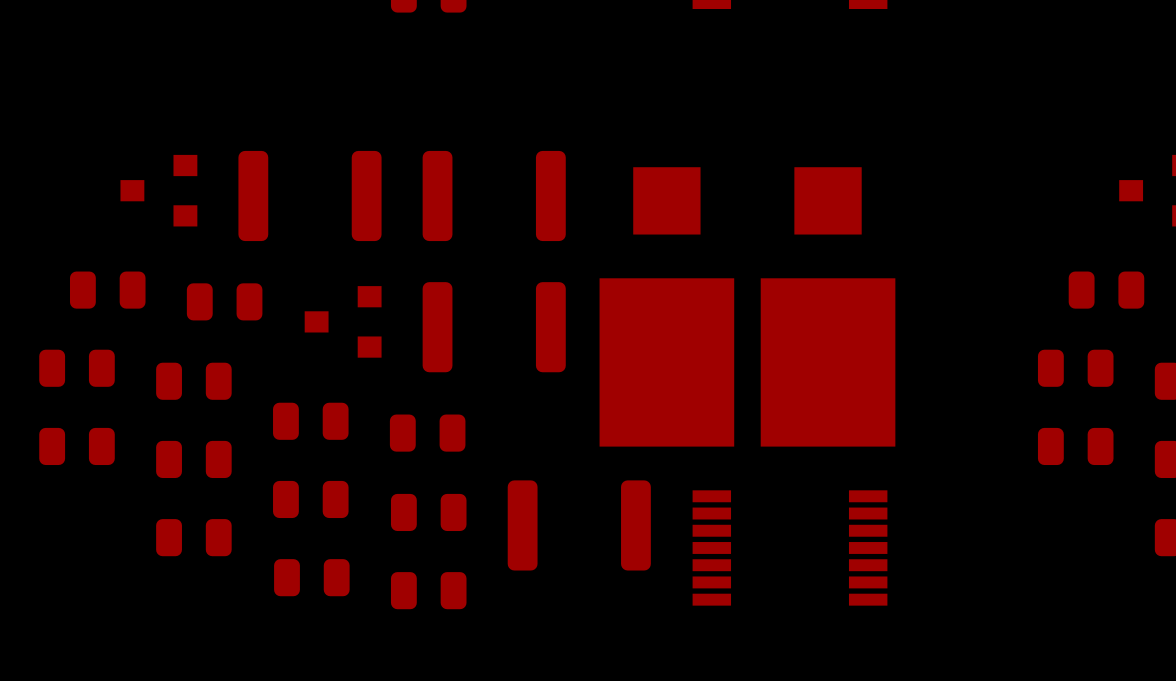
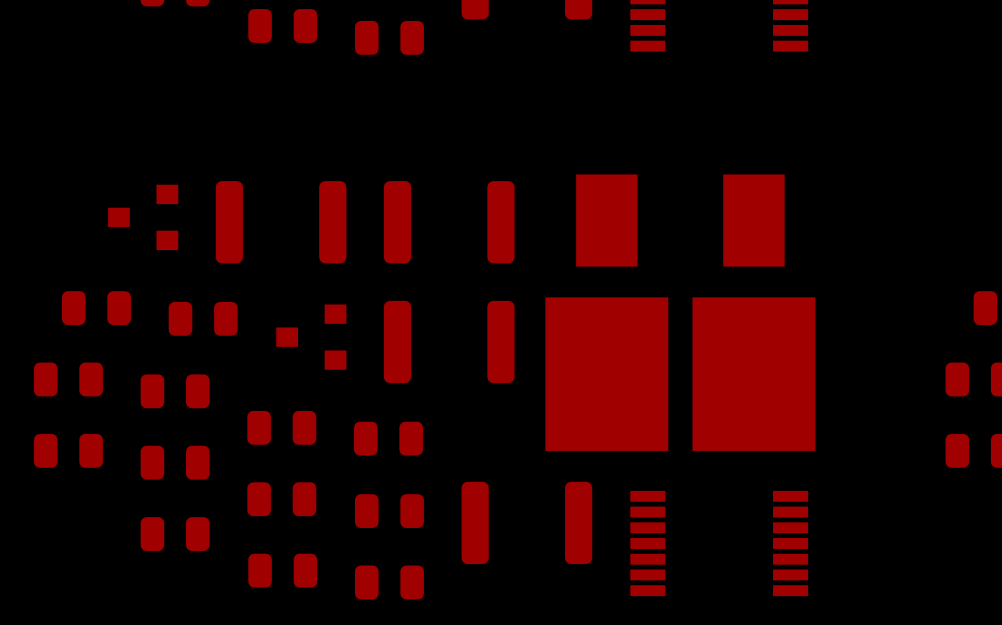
part footprint: [599, 167, 735, 447] -> [545, 174, 669, 451]
part footprint: [760, 167, 896, 447] -> [692, 174, 816, 451]

